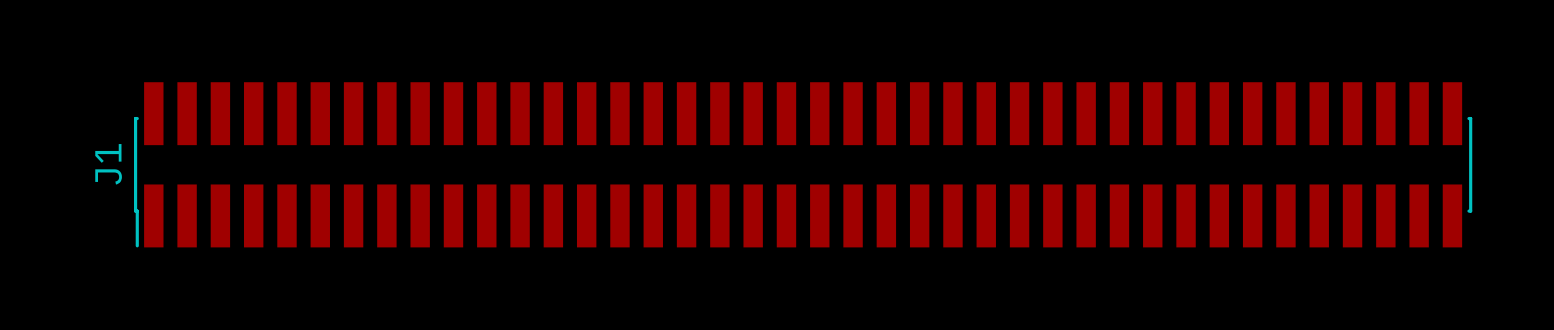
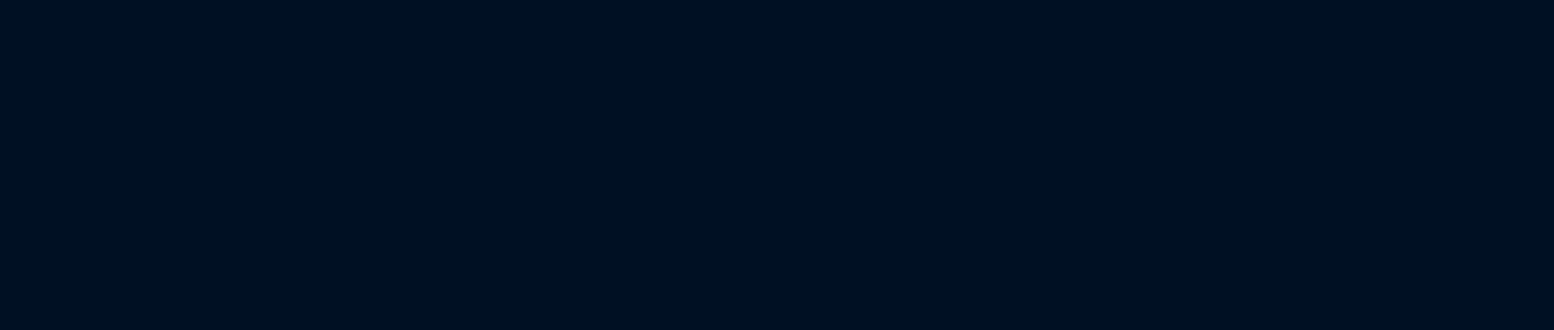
J1: (803, 164) -> none

